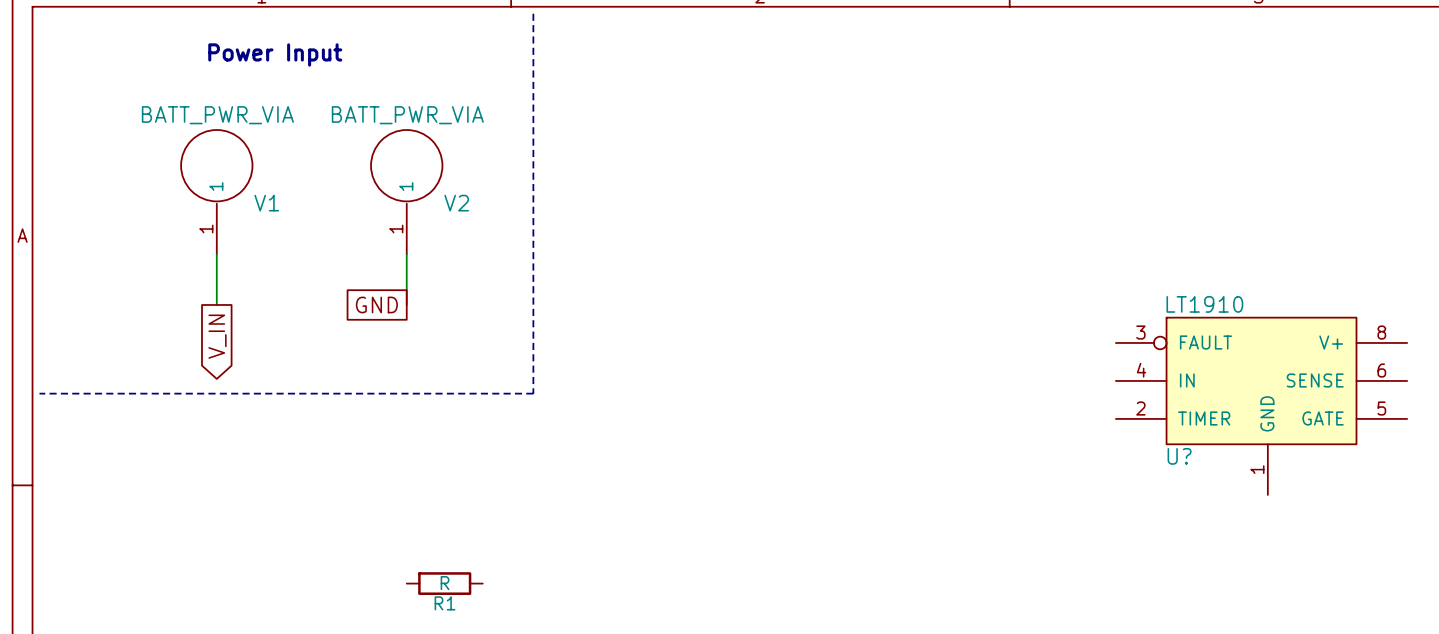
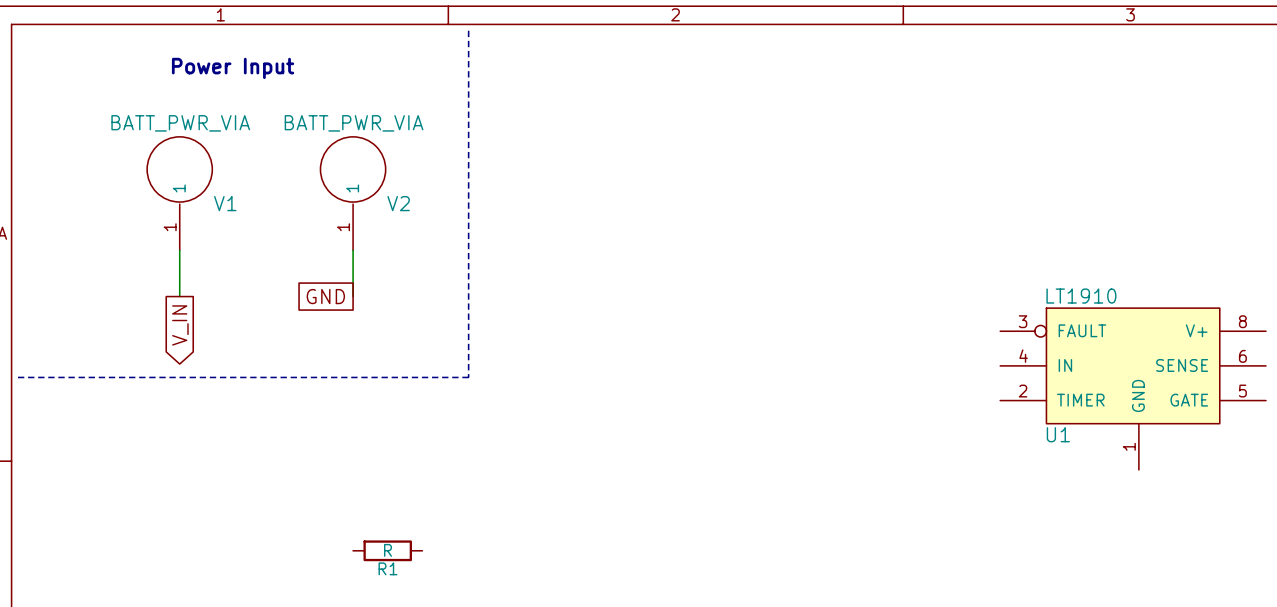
U? name: U? (1179, 456) -> U1 (1058, 434)

